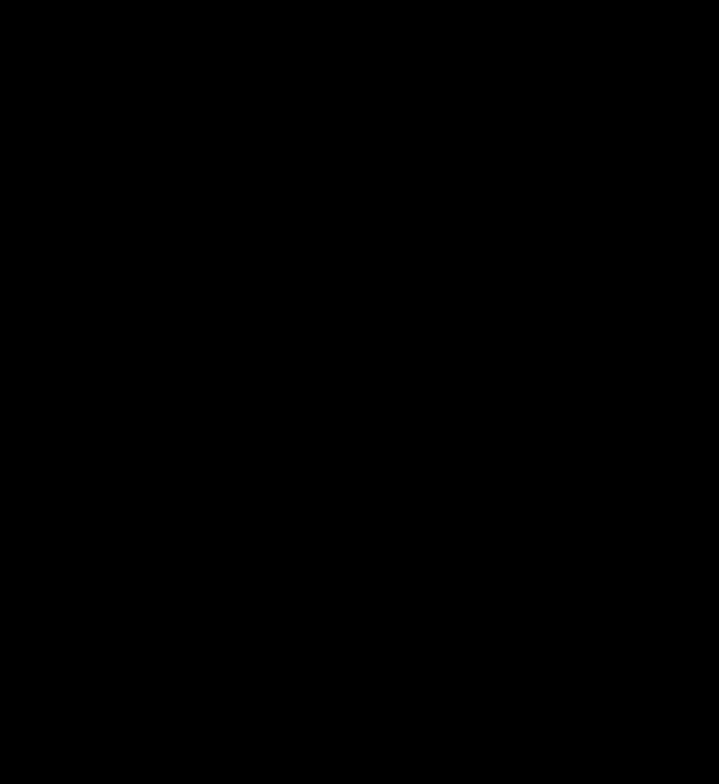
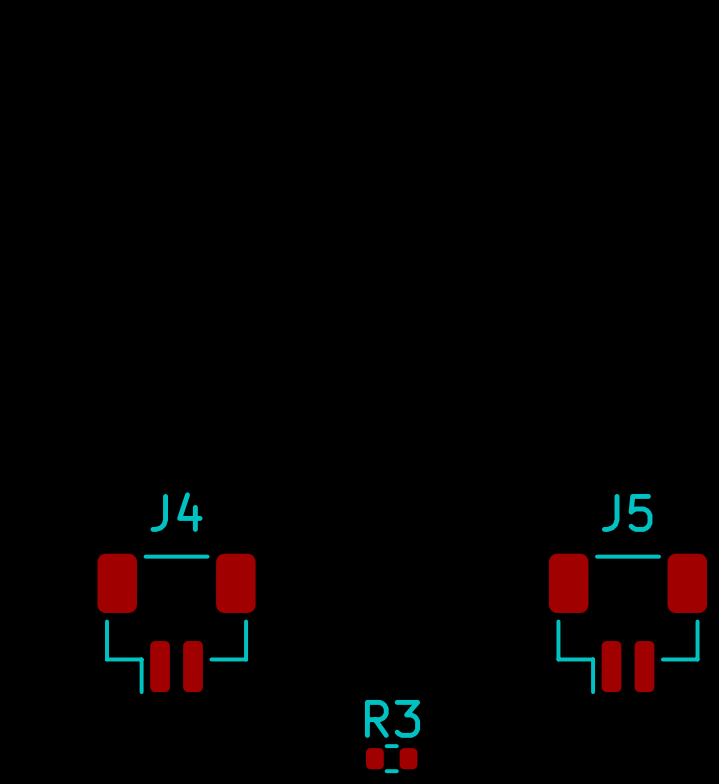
J4: none -> (176, 623)
J5: none -> (628, 623)
R3: none -> (391, 758)

